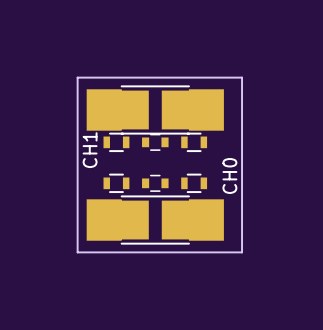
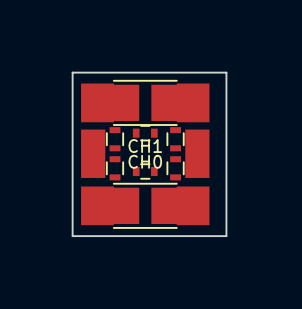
part rotation: 0° (116, 142) -> 90° clockwise (115, 139)
part rotation: 0° (194, 142) -> 90° clockwise (175, 139)
part value rotation: 0° (90, 150) -> 90° clockwise (145, 146)
part value position: CH1 (90, 150) -> CH1 (145, 146)
part: none -> (93, 153)
part: none -> (197, 153)
part value rotation: 0° (229, 176) -> 90° clockwise (145, 161)
part value position: CH0 (229, 176) -> CH0 (145, 161)
part rotation: 0° (116, 183) -> 90° clockwise (115, 168)
part rotation: 0° (194, 183) -> 90° clockwise (175, 168)

